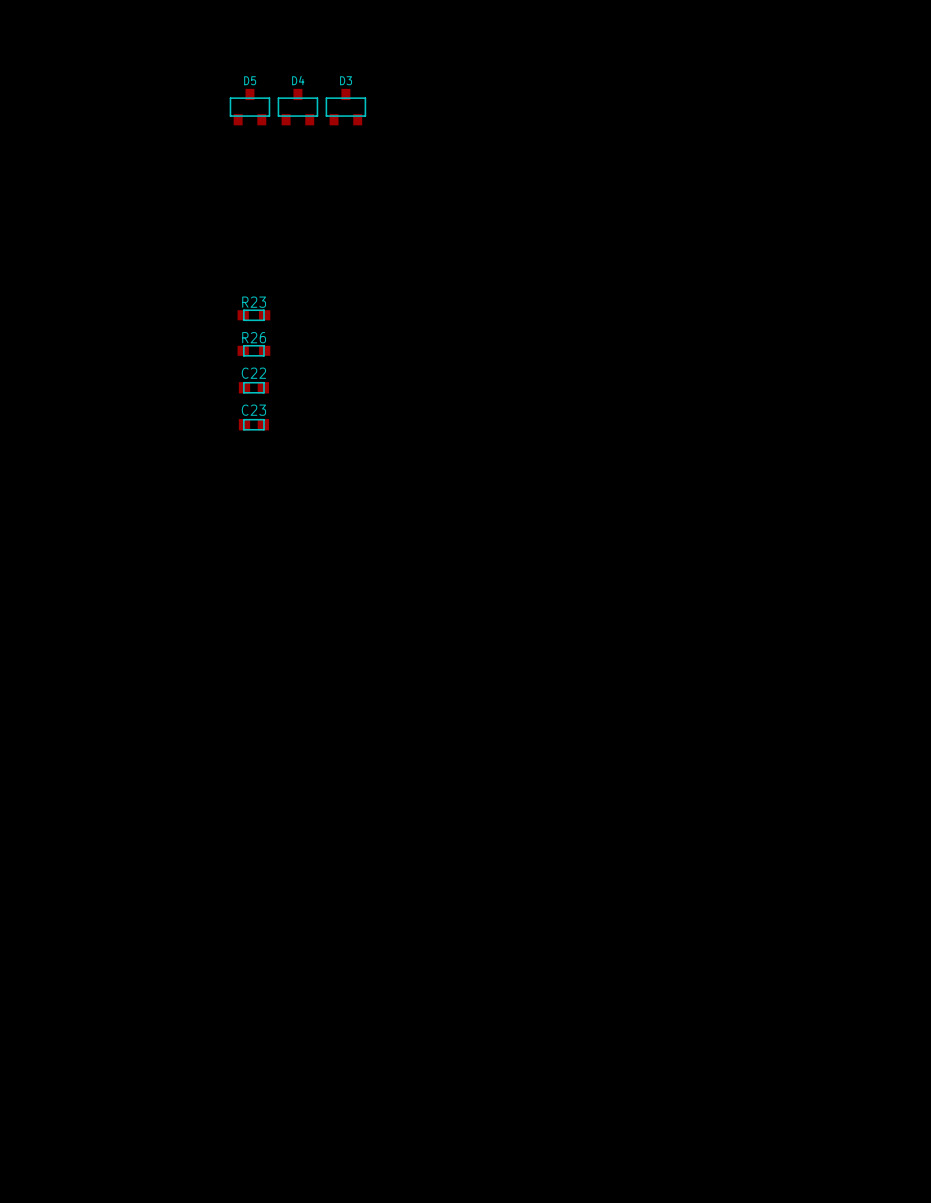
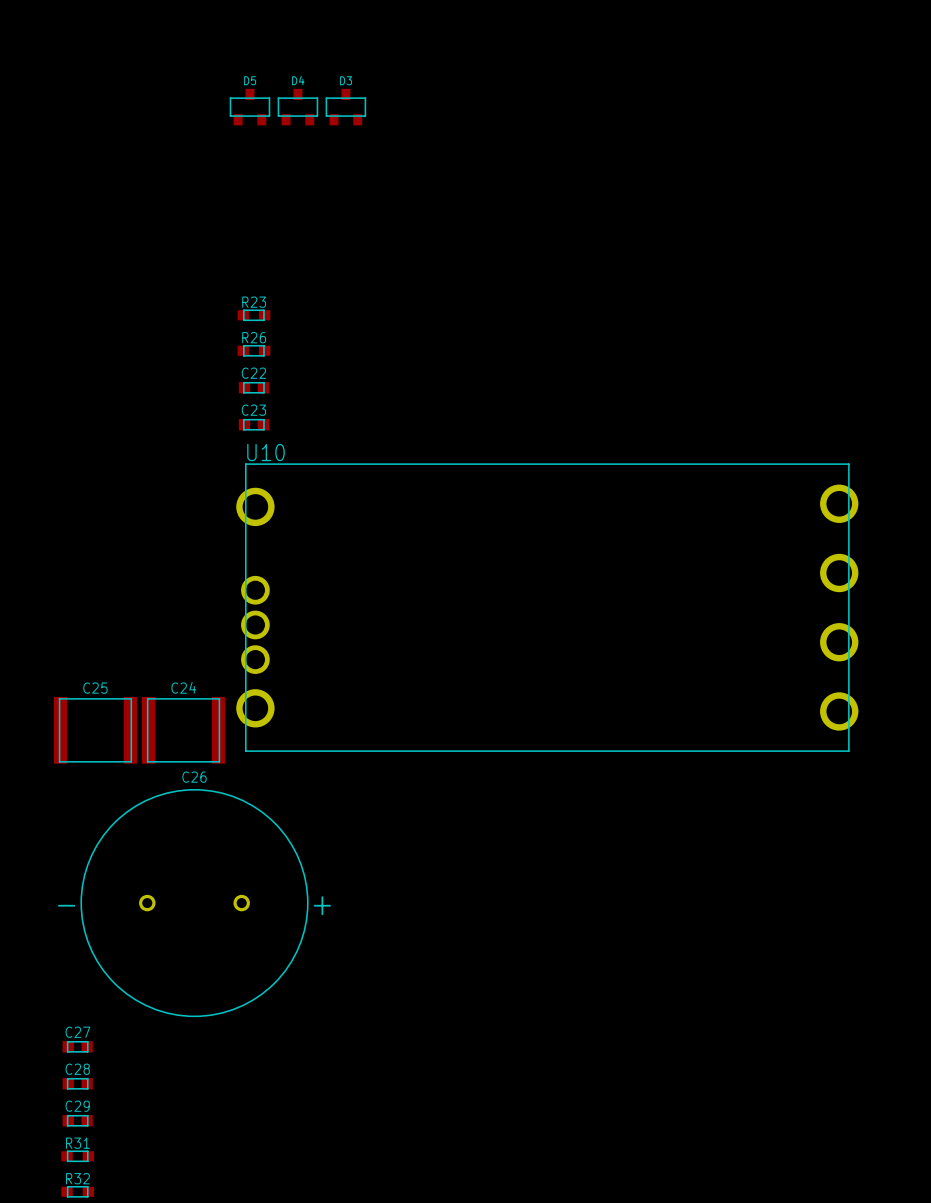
U10: none -> (547, 607)
C25: none -> (95, 730)
C24: none -> (183, 730)
C26: none -> (194, 903)
C27: none -> (77, 1046)
C28: none -> (77, 1083)
C29: none -> (77, 1120)
R31: none -> (77, 1156)
R32: none -> (77, 1191)

